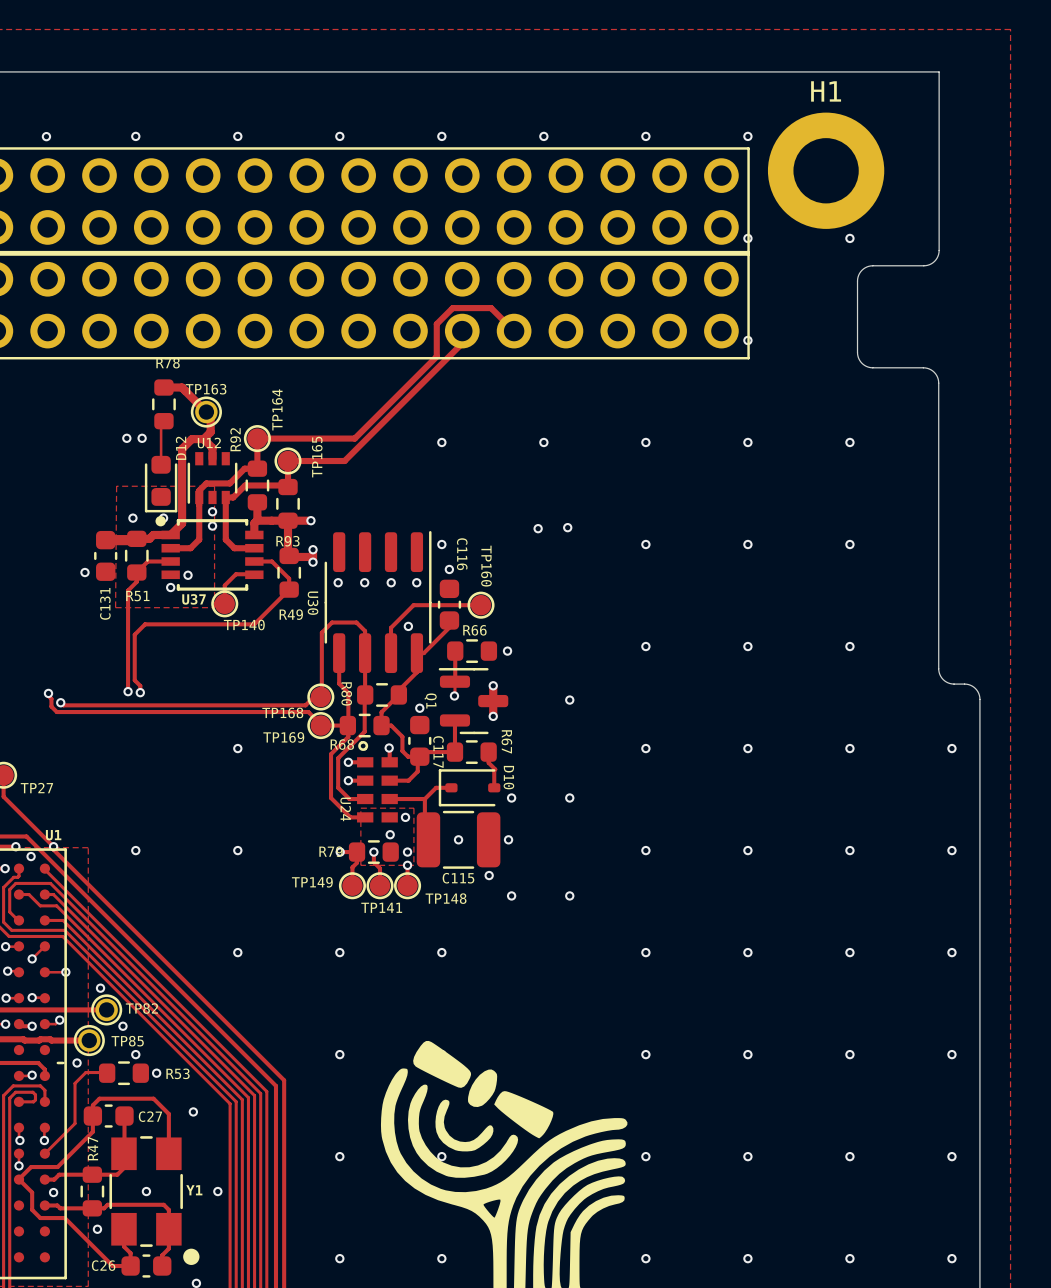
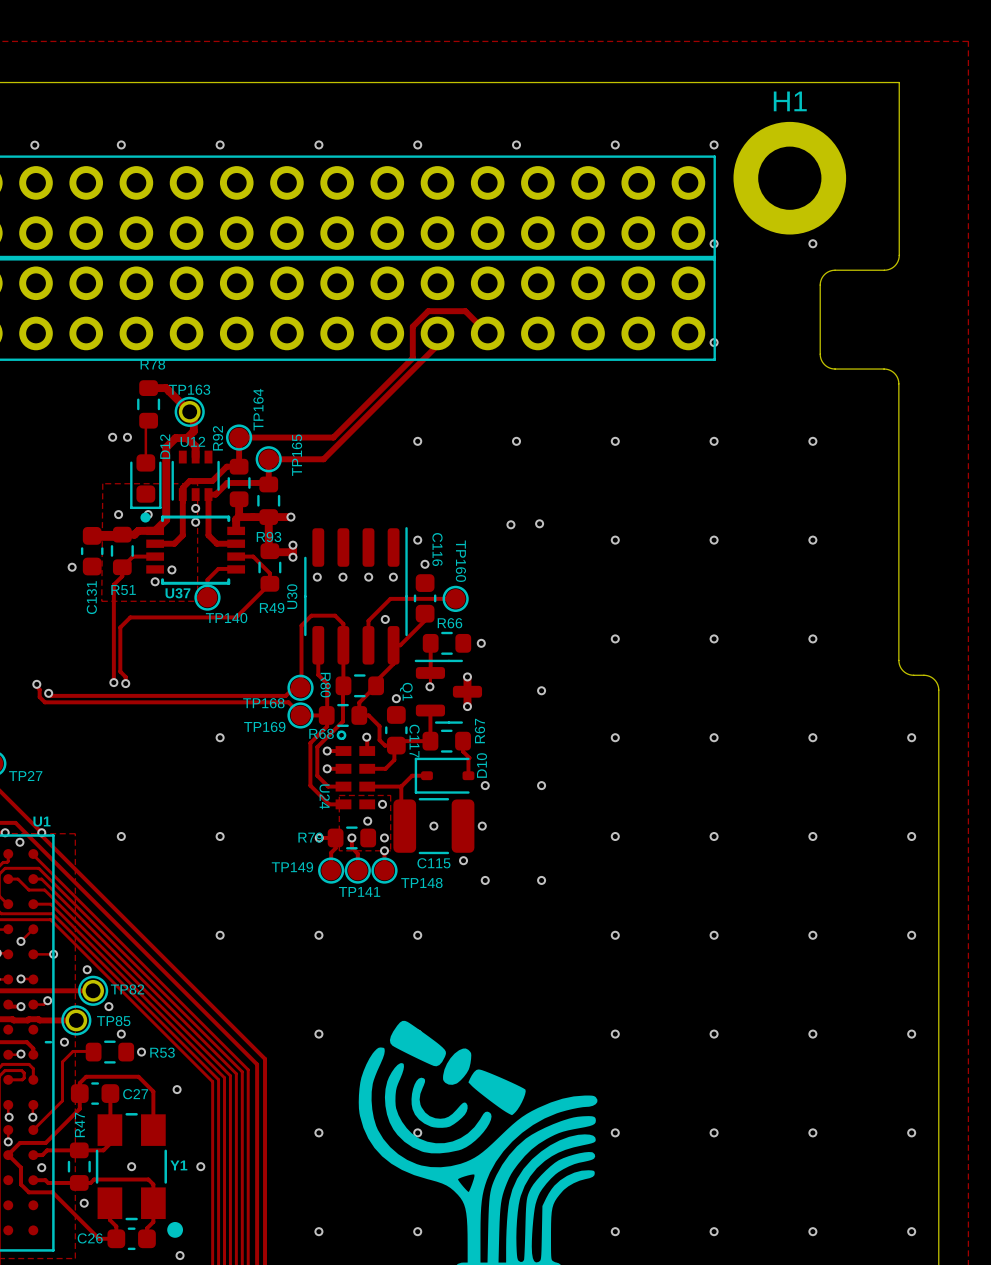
U30 name rotation: 0° (313, 603) -> 180° (292, 596)
R67 name rotation: 0° (506, 741) -> 180° (479, 731)
D10 name rotation: 0° (508, 777) -> 180° (481, 765)

